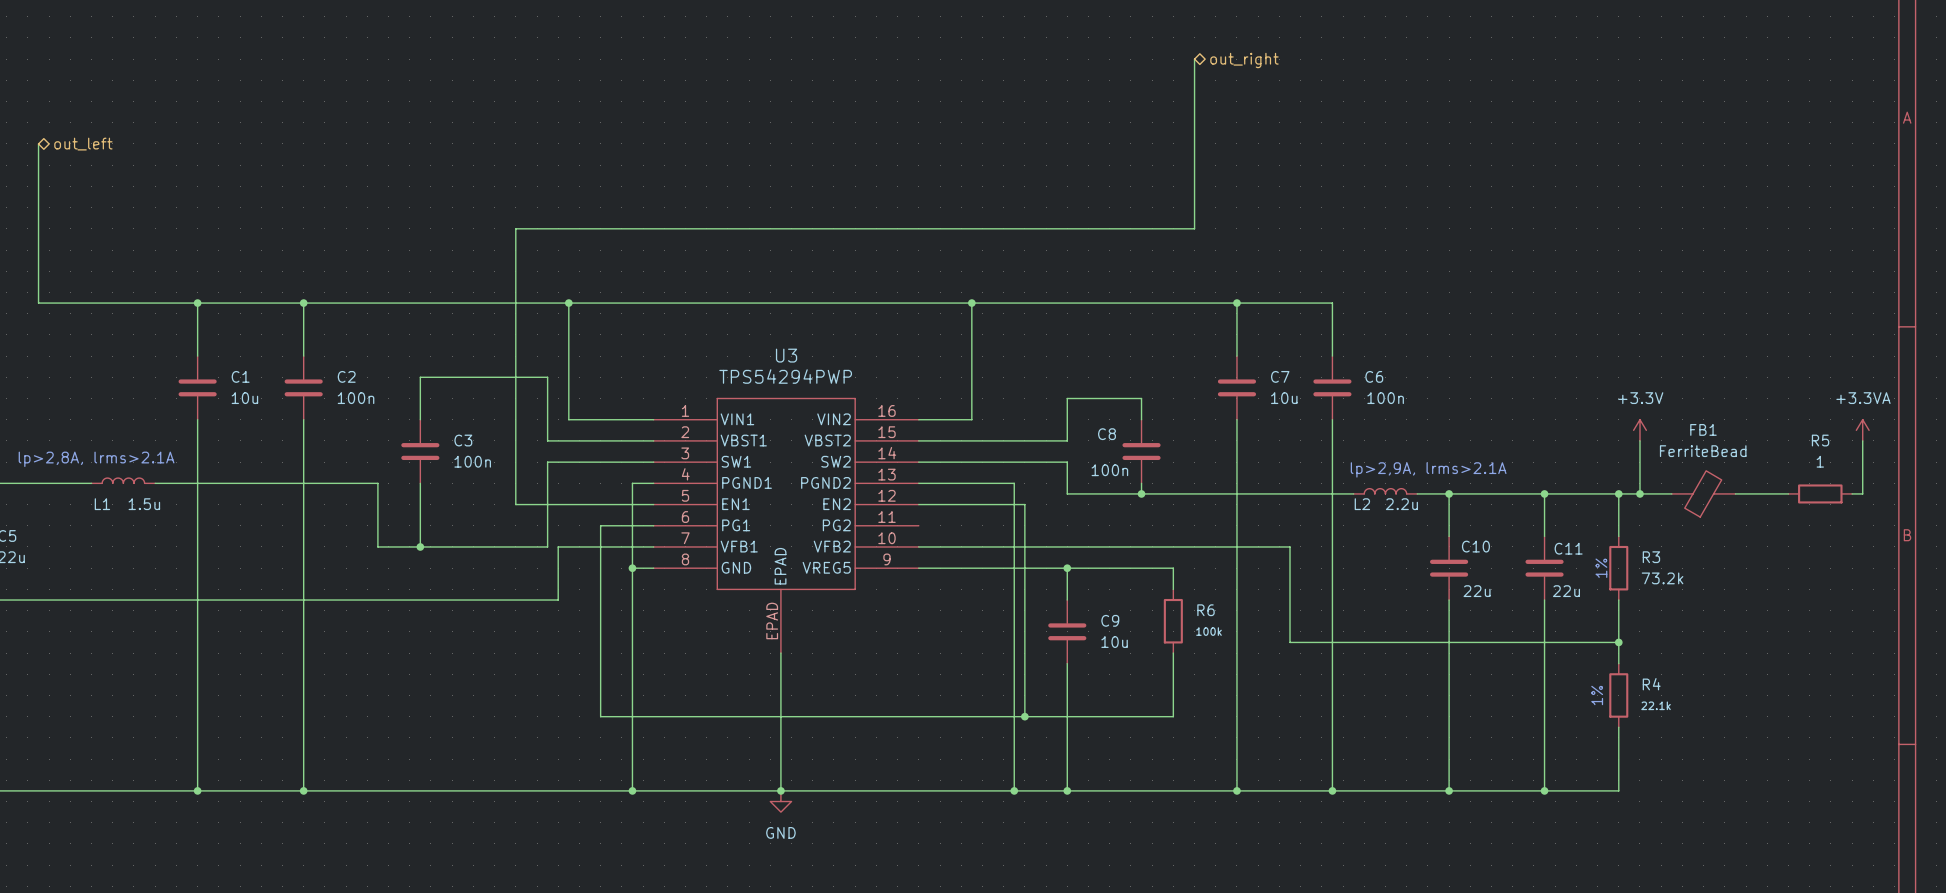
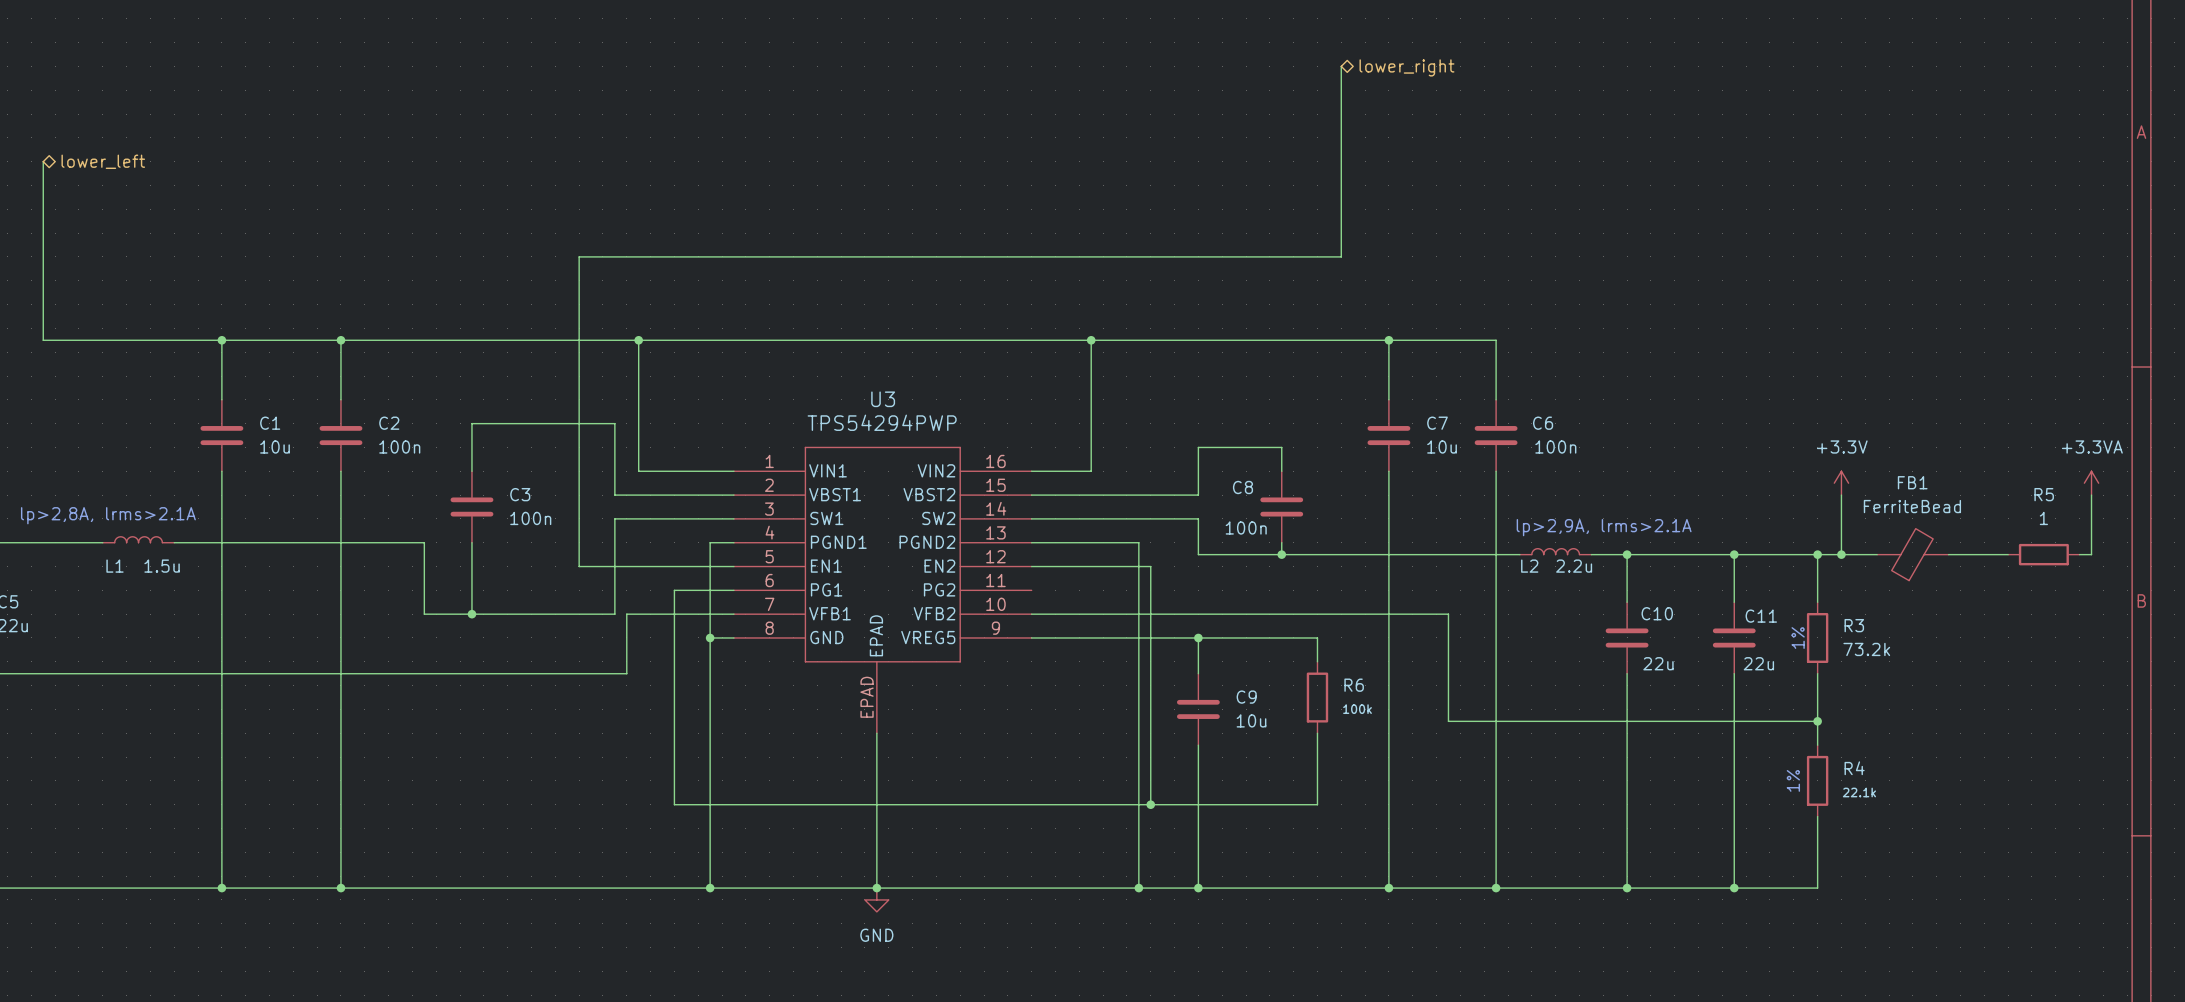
hierarchical label: out_right (1244, 60) -> lower_right (1406, 67)
hierarchical label: out_left (83, 144) -> lower_left (103, 161)

